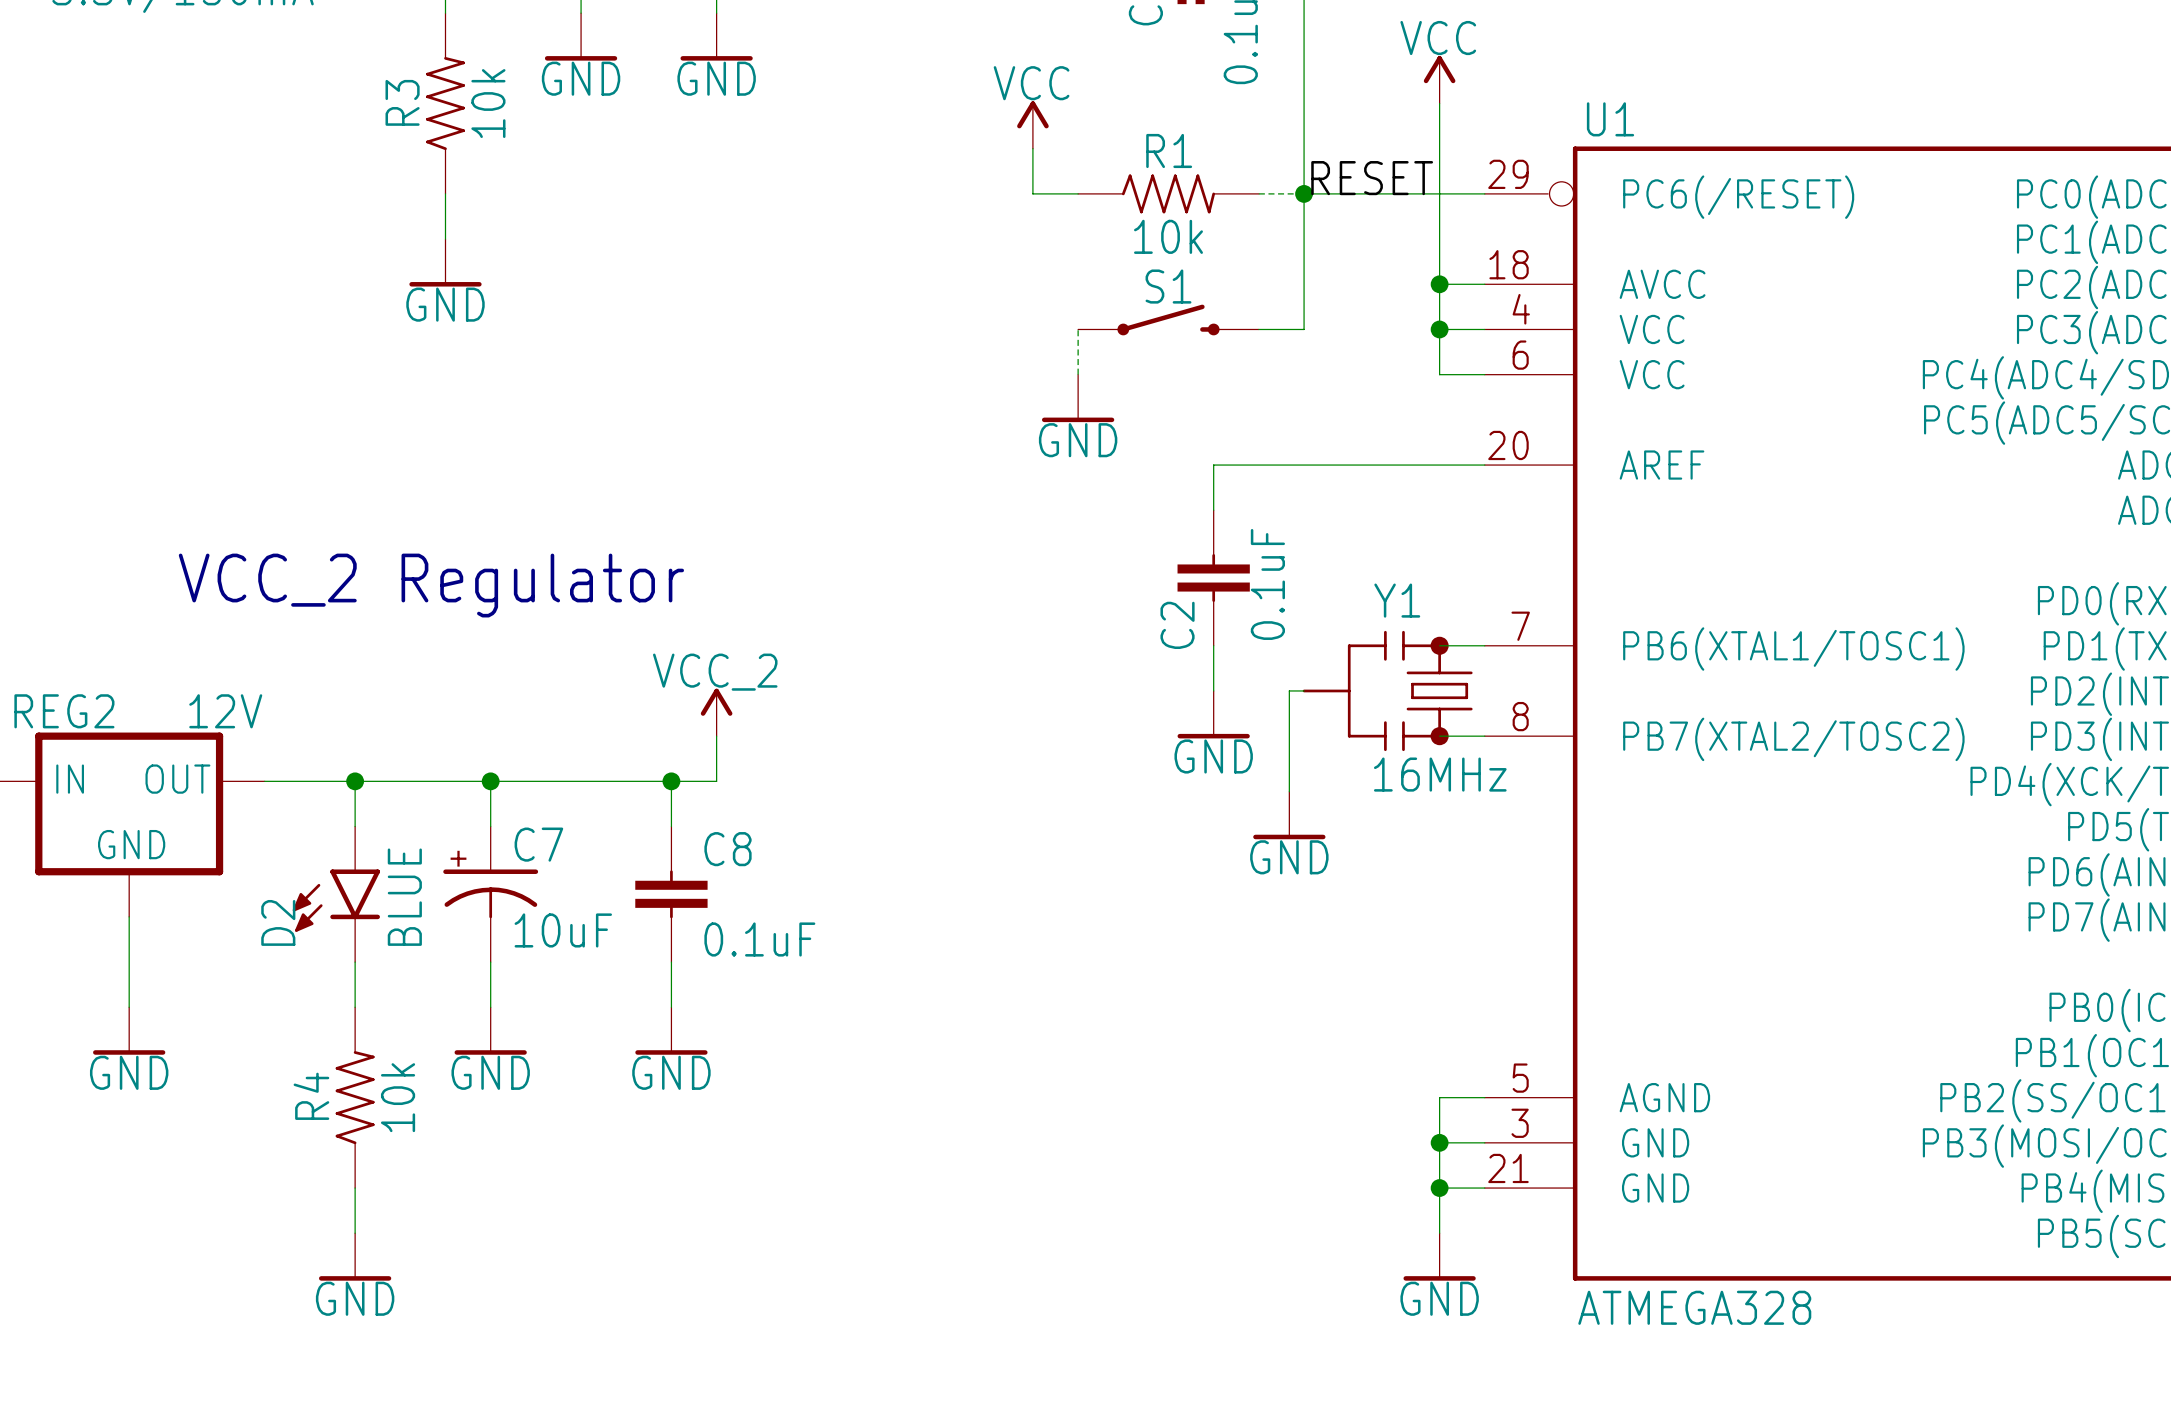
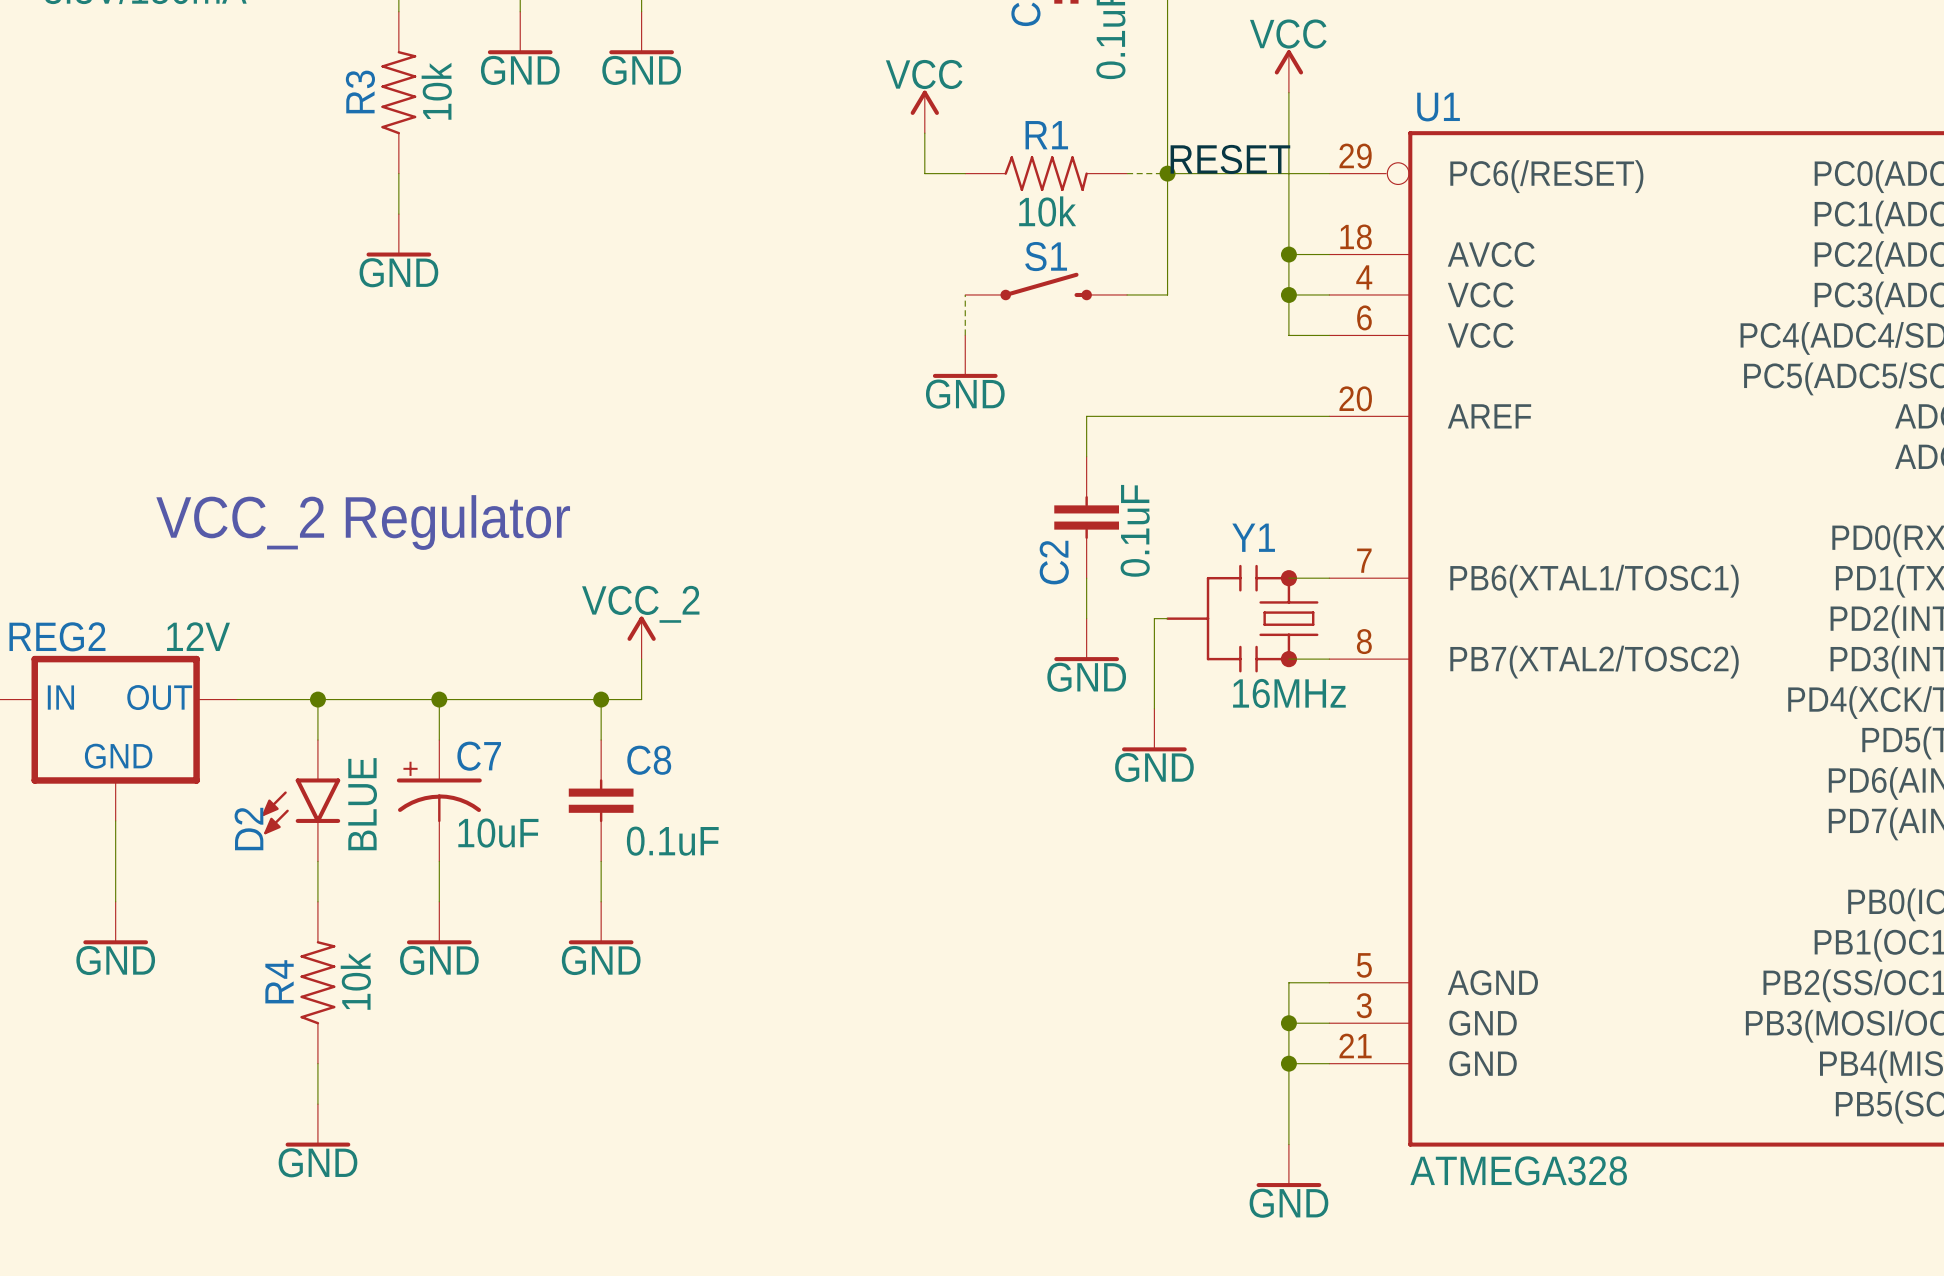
power symbol position: GND (1439, 1256) -> GND (1288, 1165)

